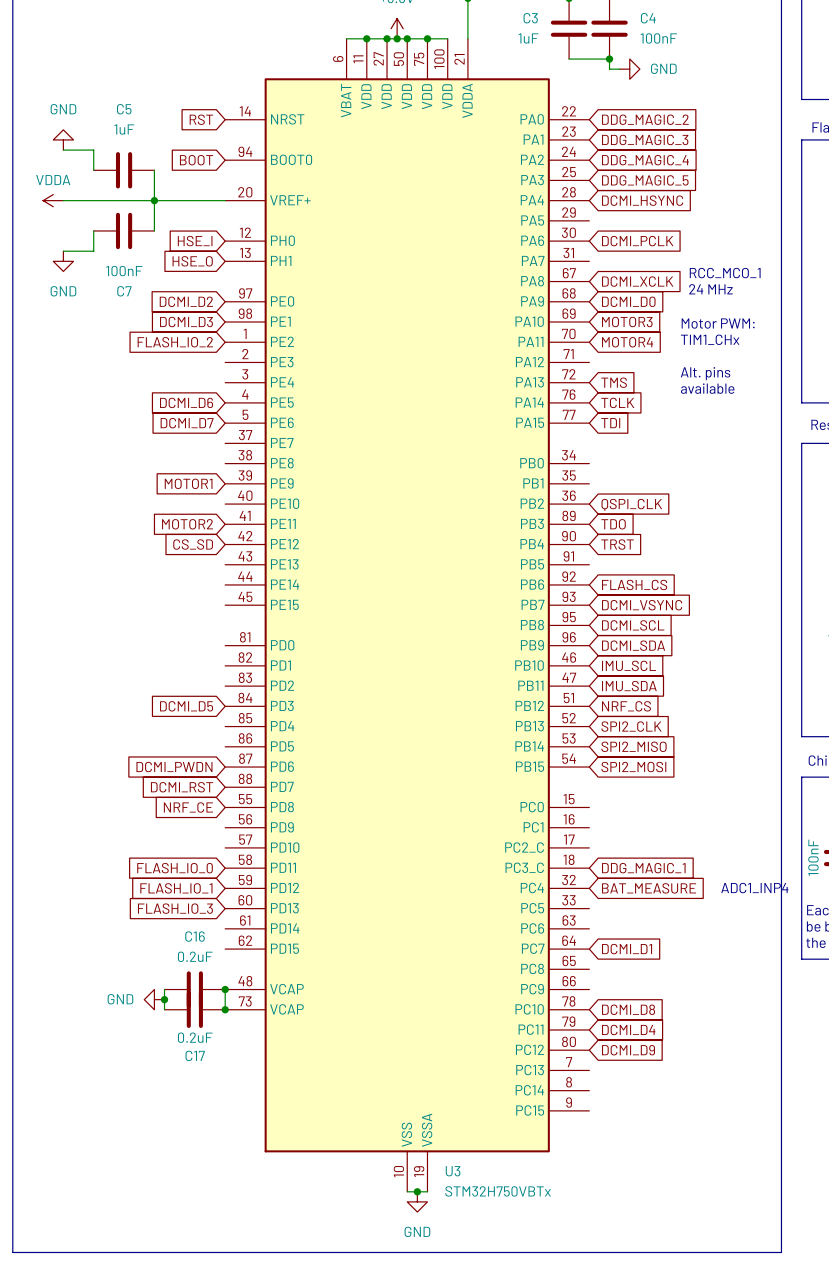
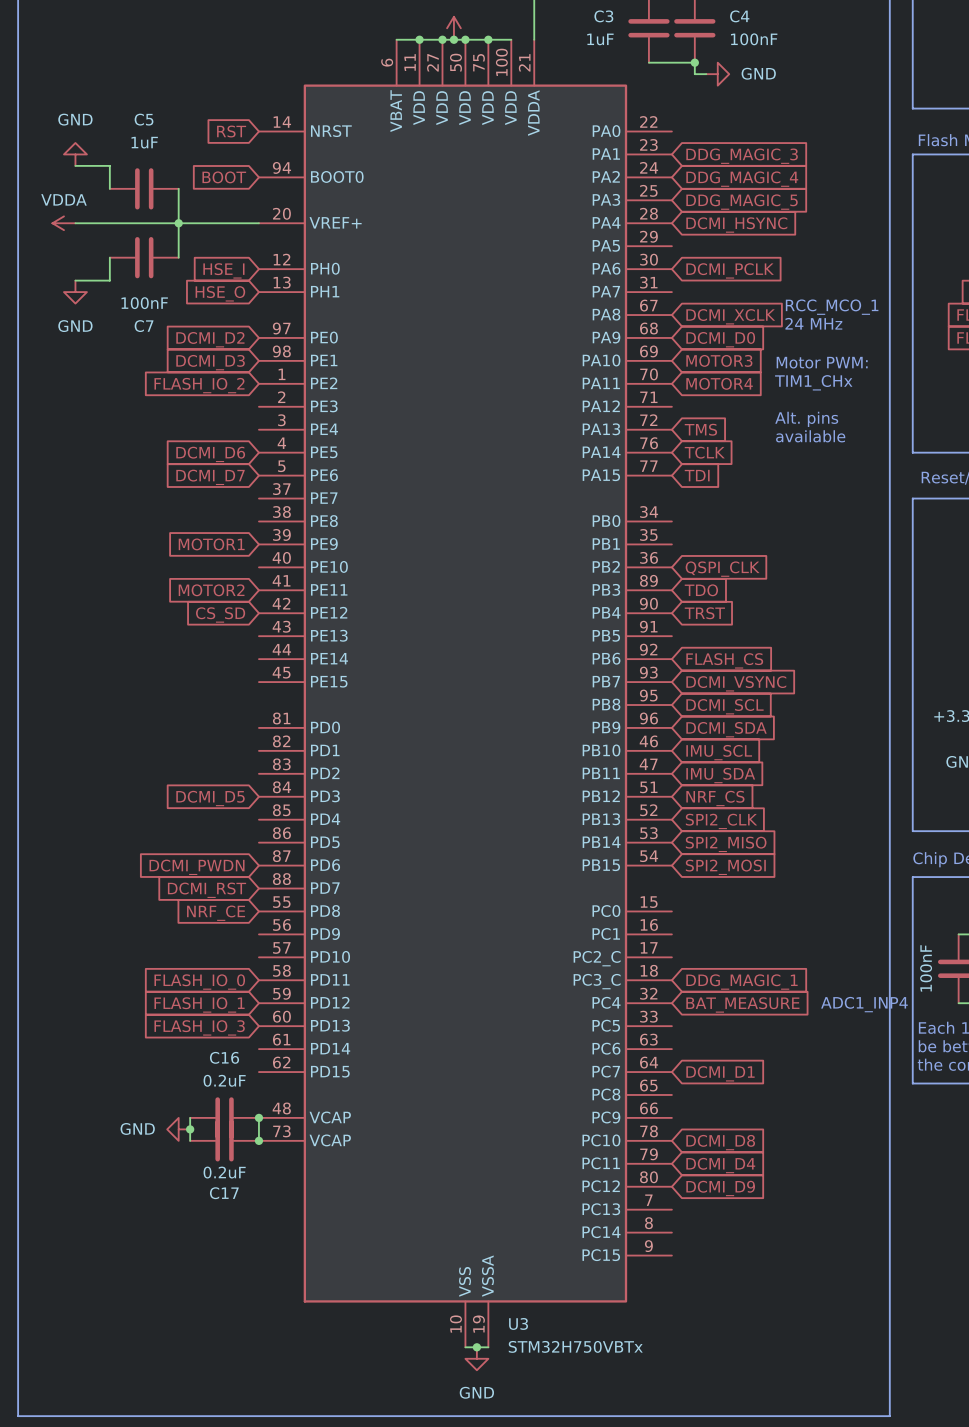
global label: DDG_MAGIC_2 (645, 119) -> none

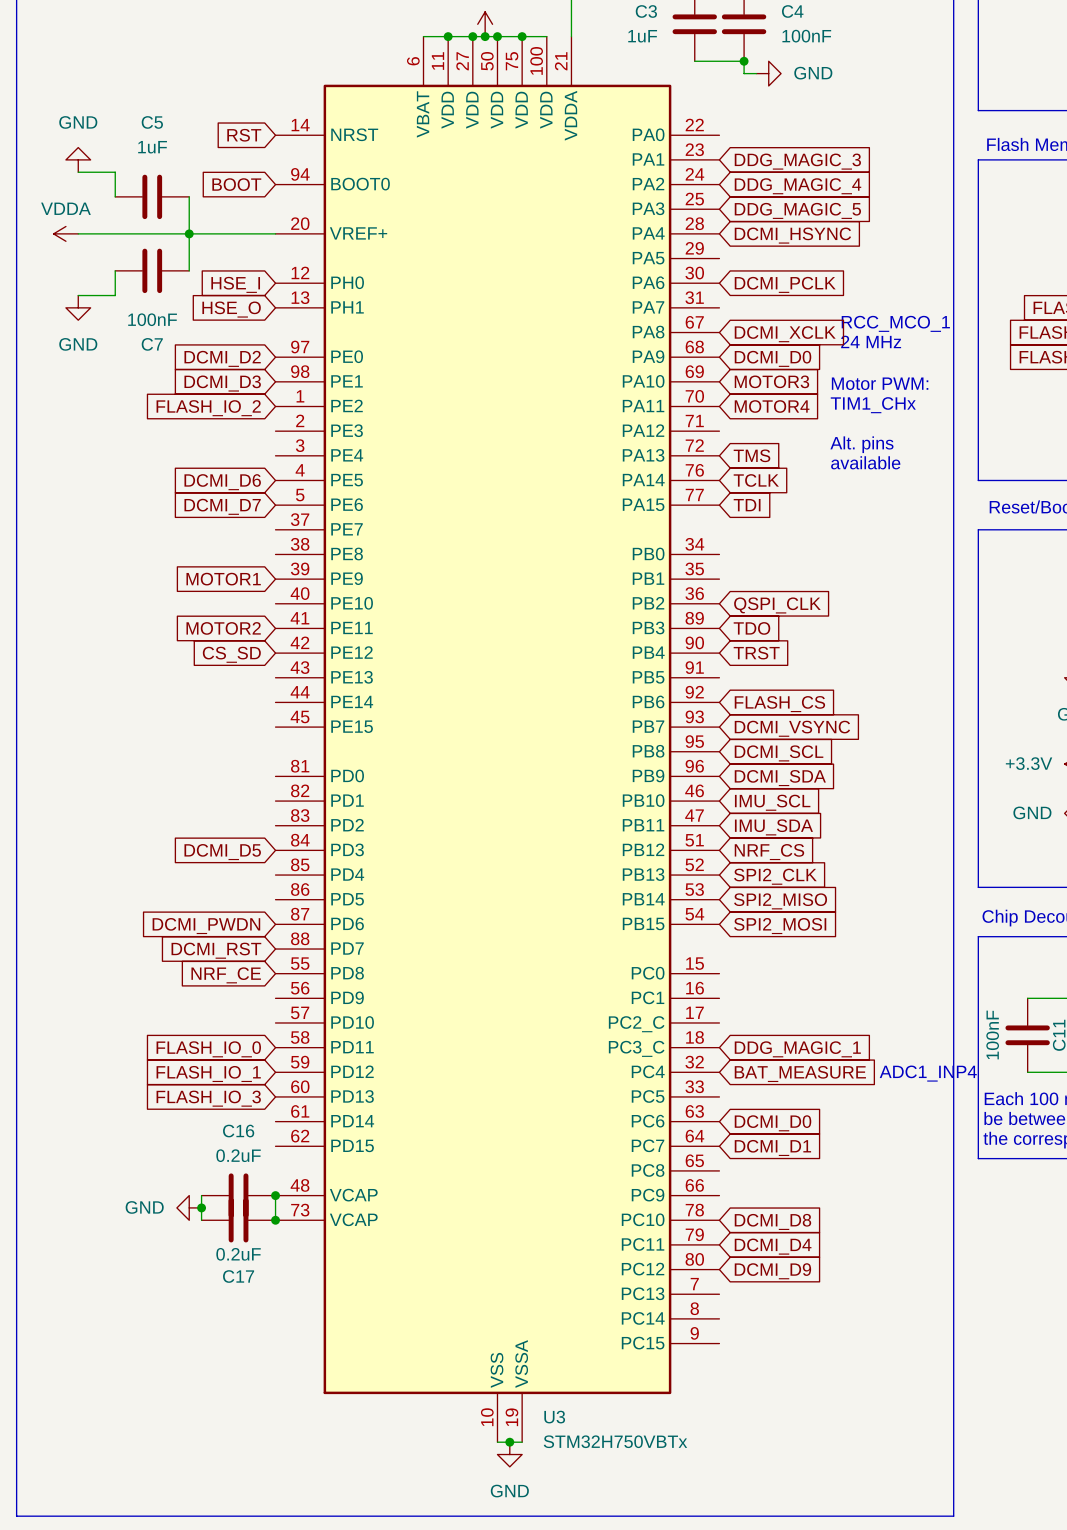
global label: none -> DCMI_D0 (773, 1123)

